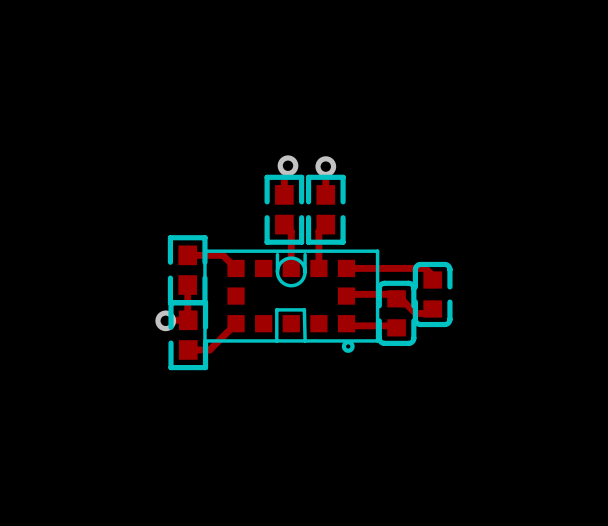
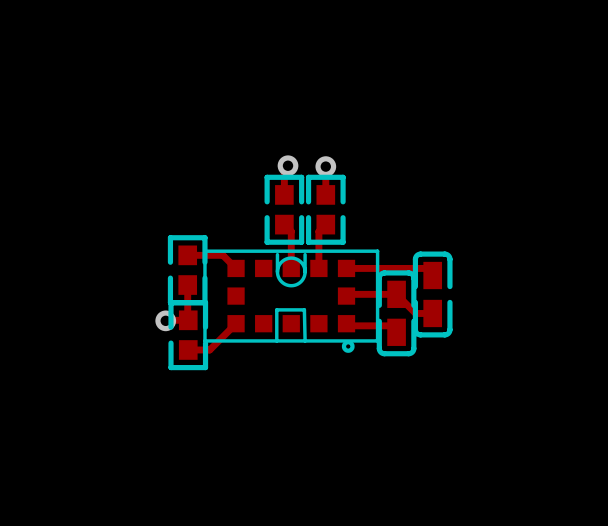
part footprint: [412, 261, 453, 328] -> [412, 251, 453, 338]
part footprint: [376, 280, 417, 346] -> [376, 270, 417, 357]

